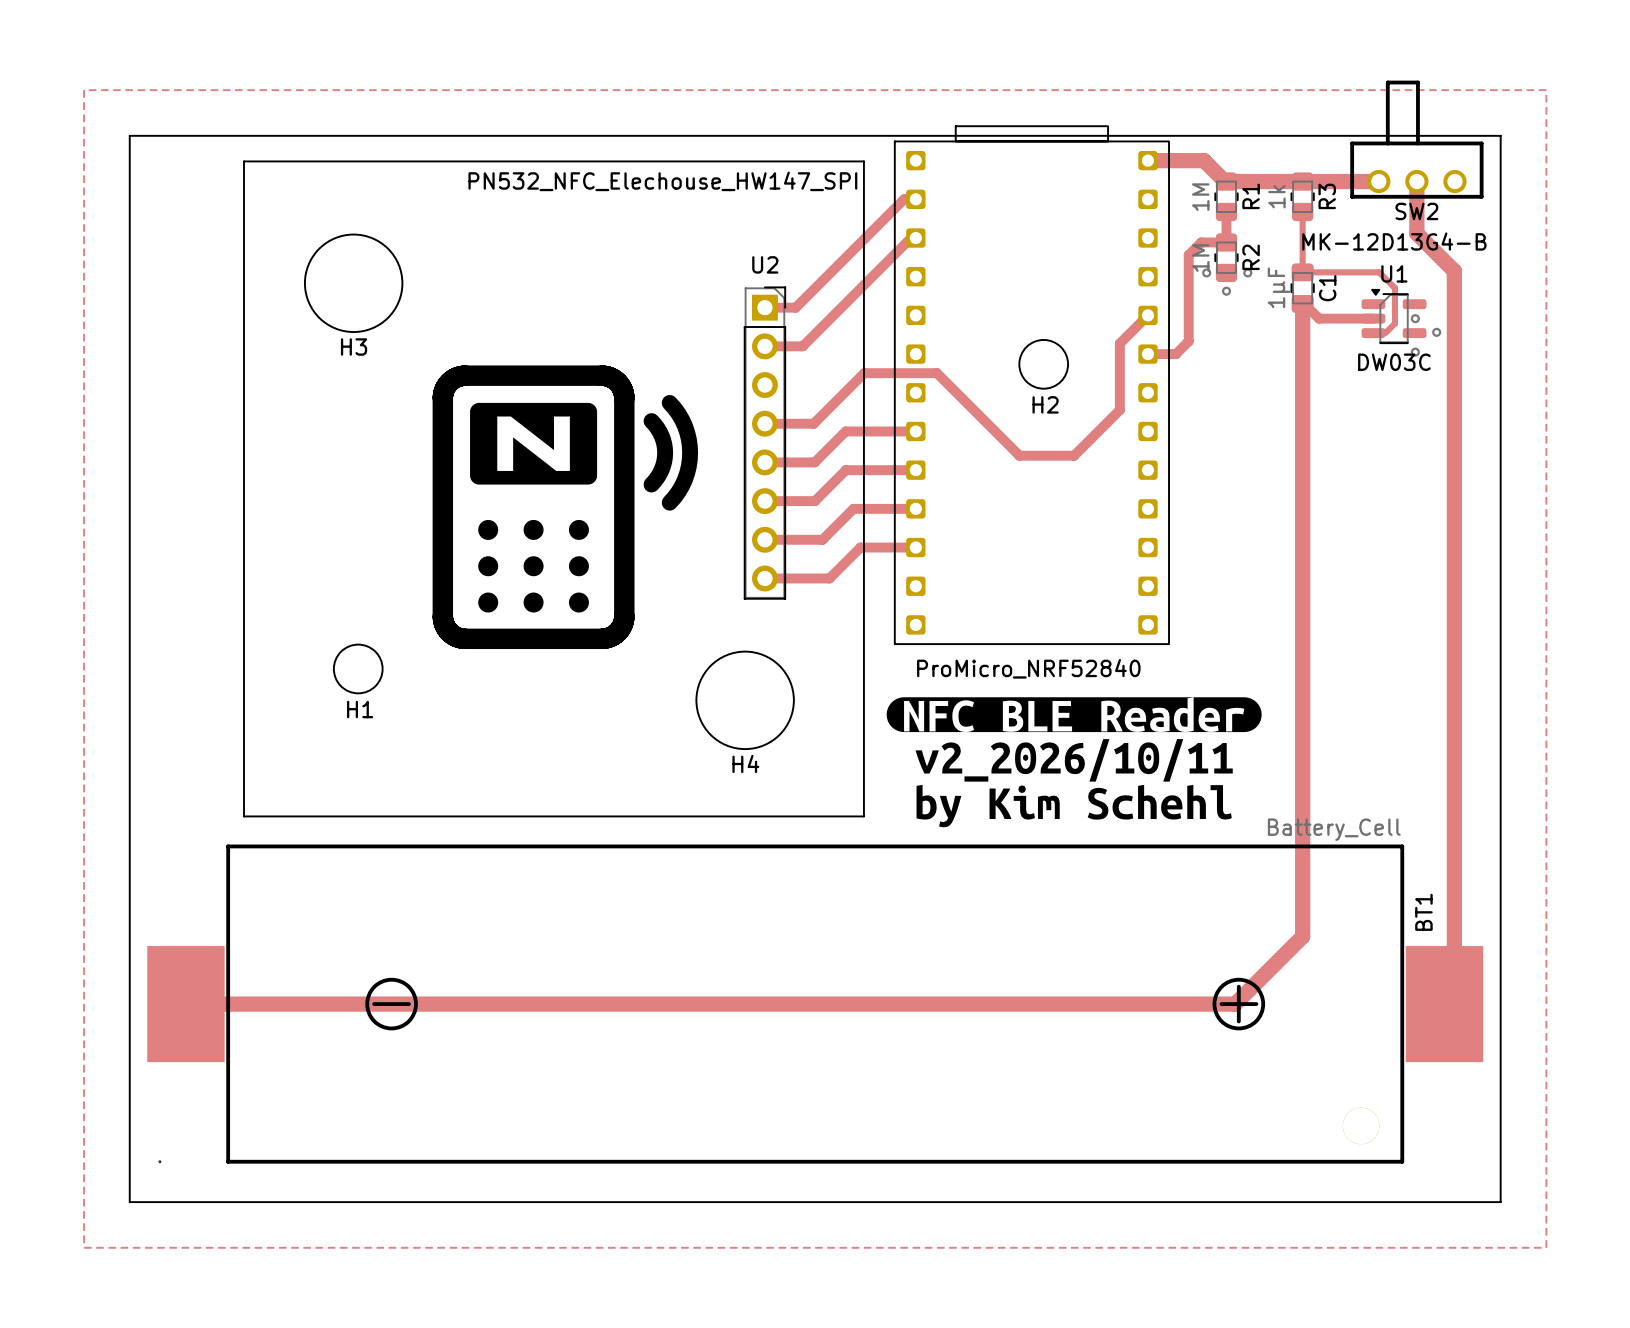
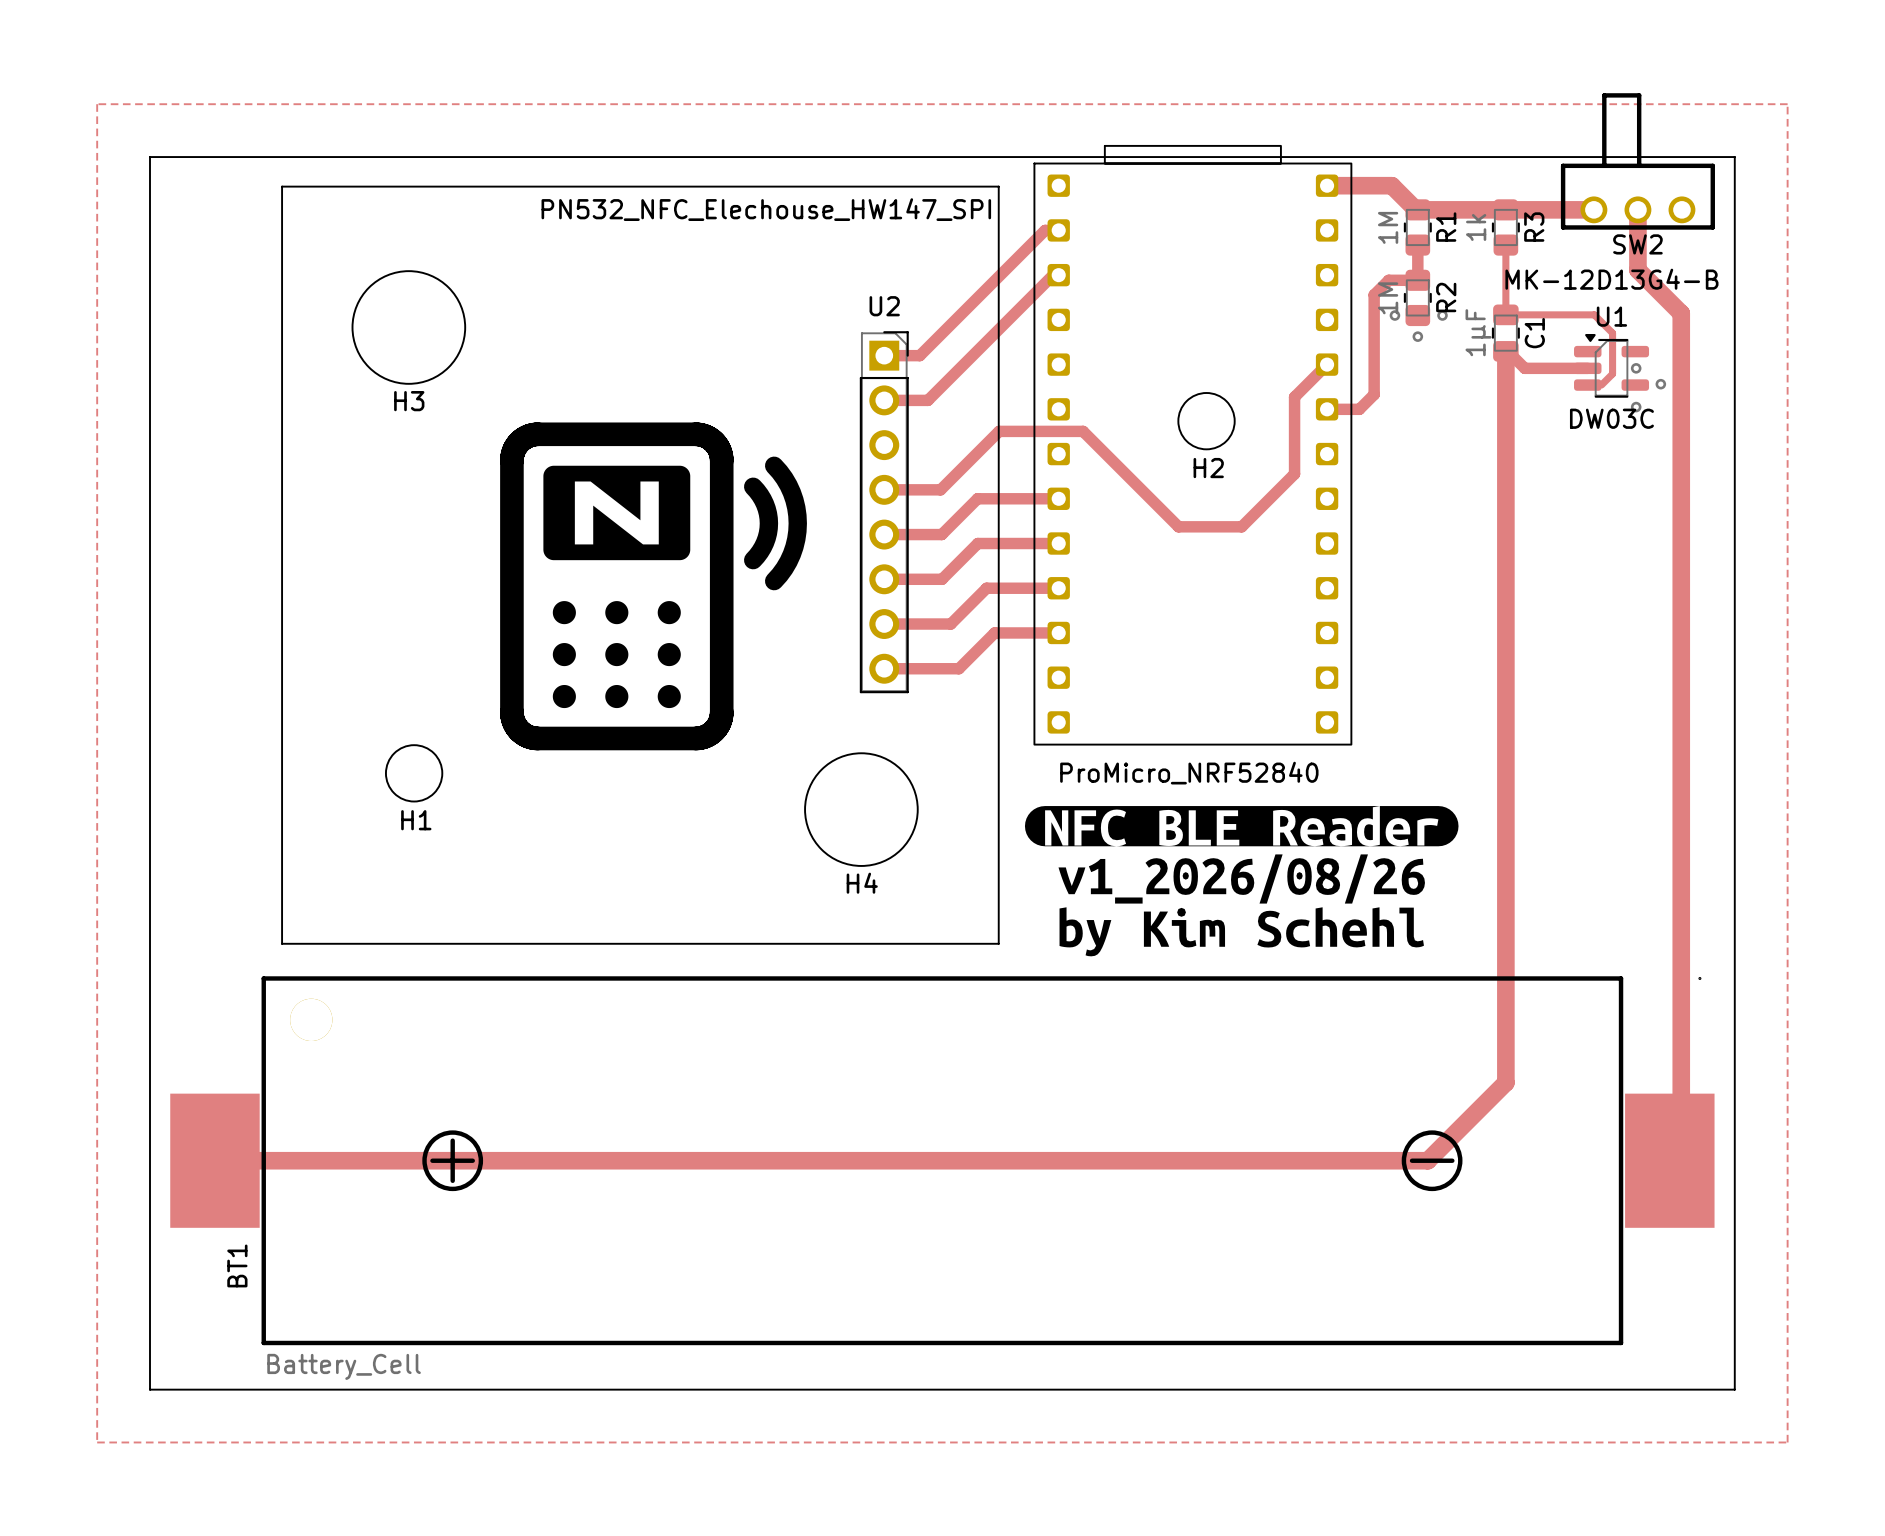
drawing shape: [915, 739, 1233, 782] -> [1058, 854, 1425, 904]
BT1 rotation: 0° (815, 1004) -> 180° (942, 1160)

